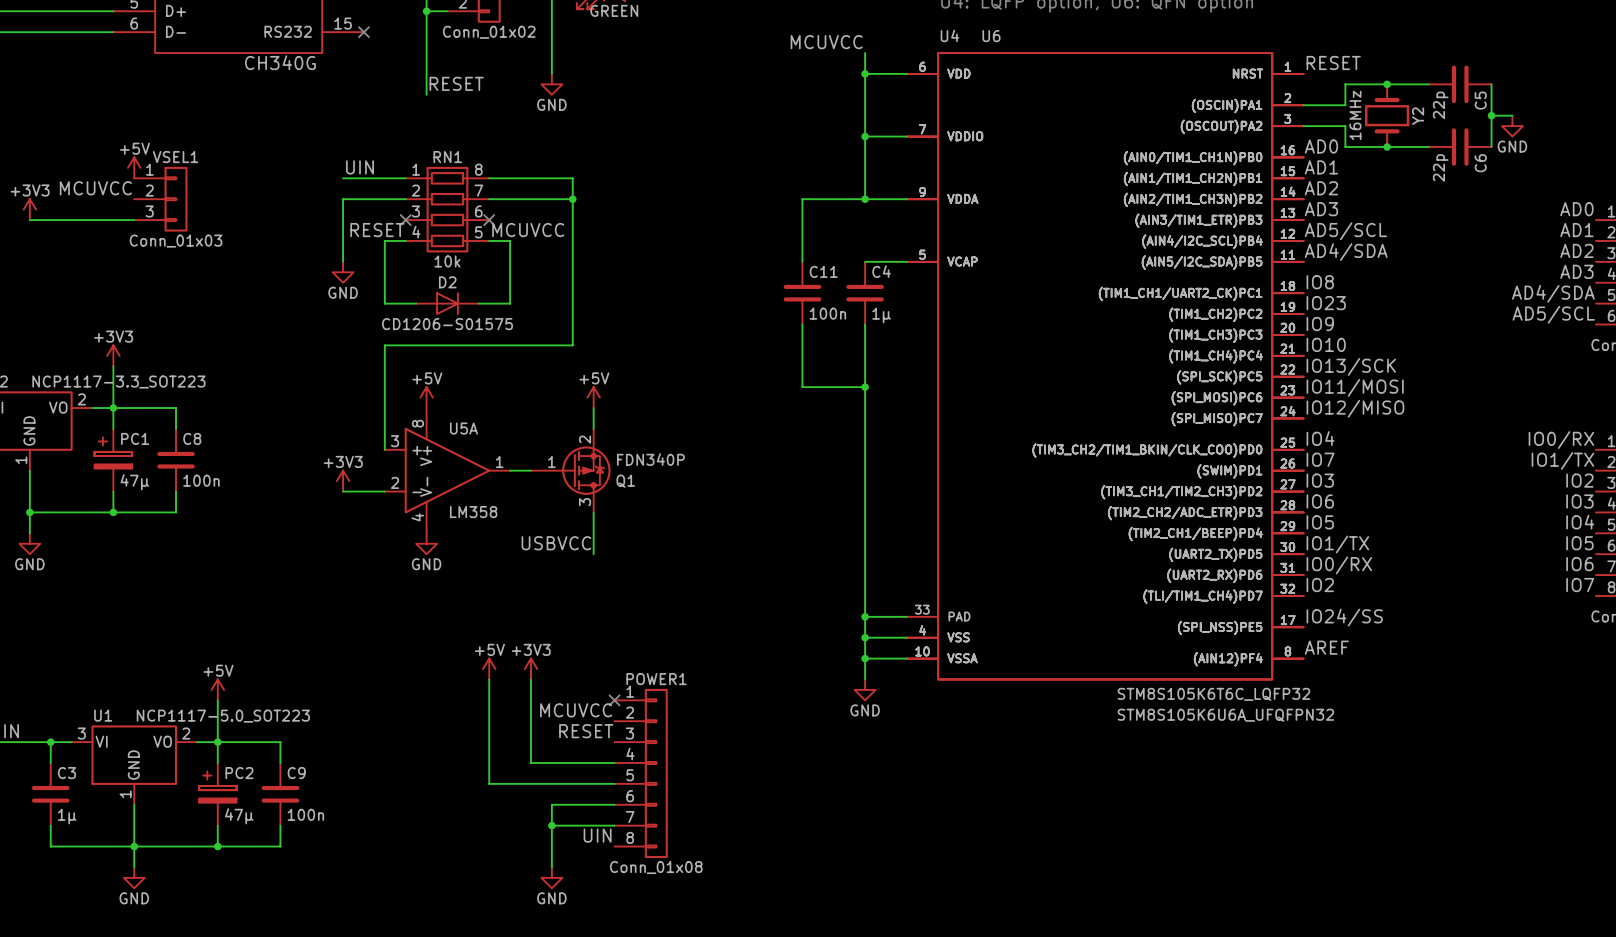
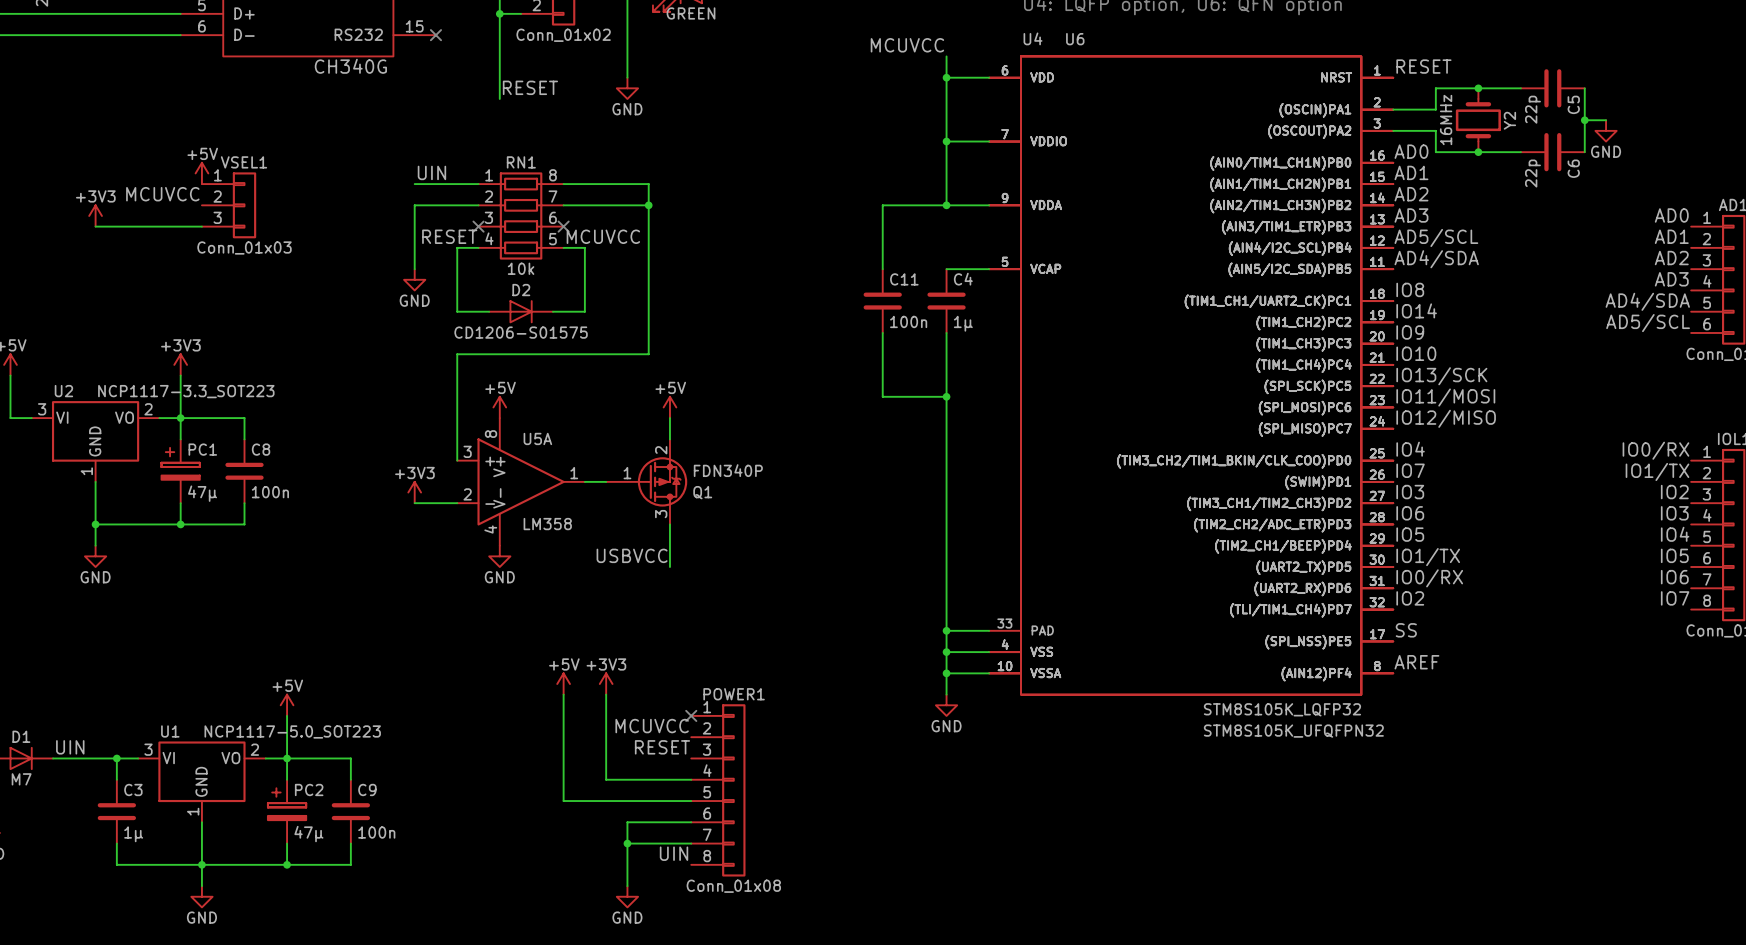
label: IO23 (1326, 303) -> IO14 (1416, 310)
label: IO24/SS (1344, 617) -> SS (1406, 630)
U4 value: STM8S105K6T6C_LQFP32 (1213, 694) -> STM8S105K_LQFP32 (1282, 709)
U6 value: STM8S105K6U6A_UFQFPN32 (1225, 715) -> STM8S105K_UFQFPN32 (1293, 731)

